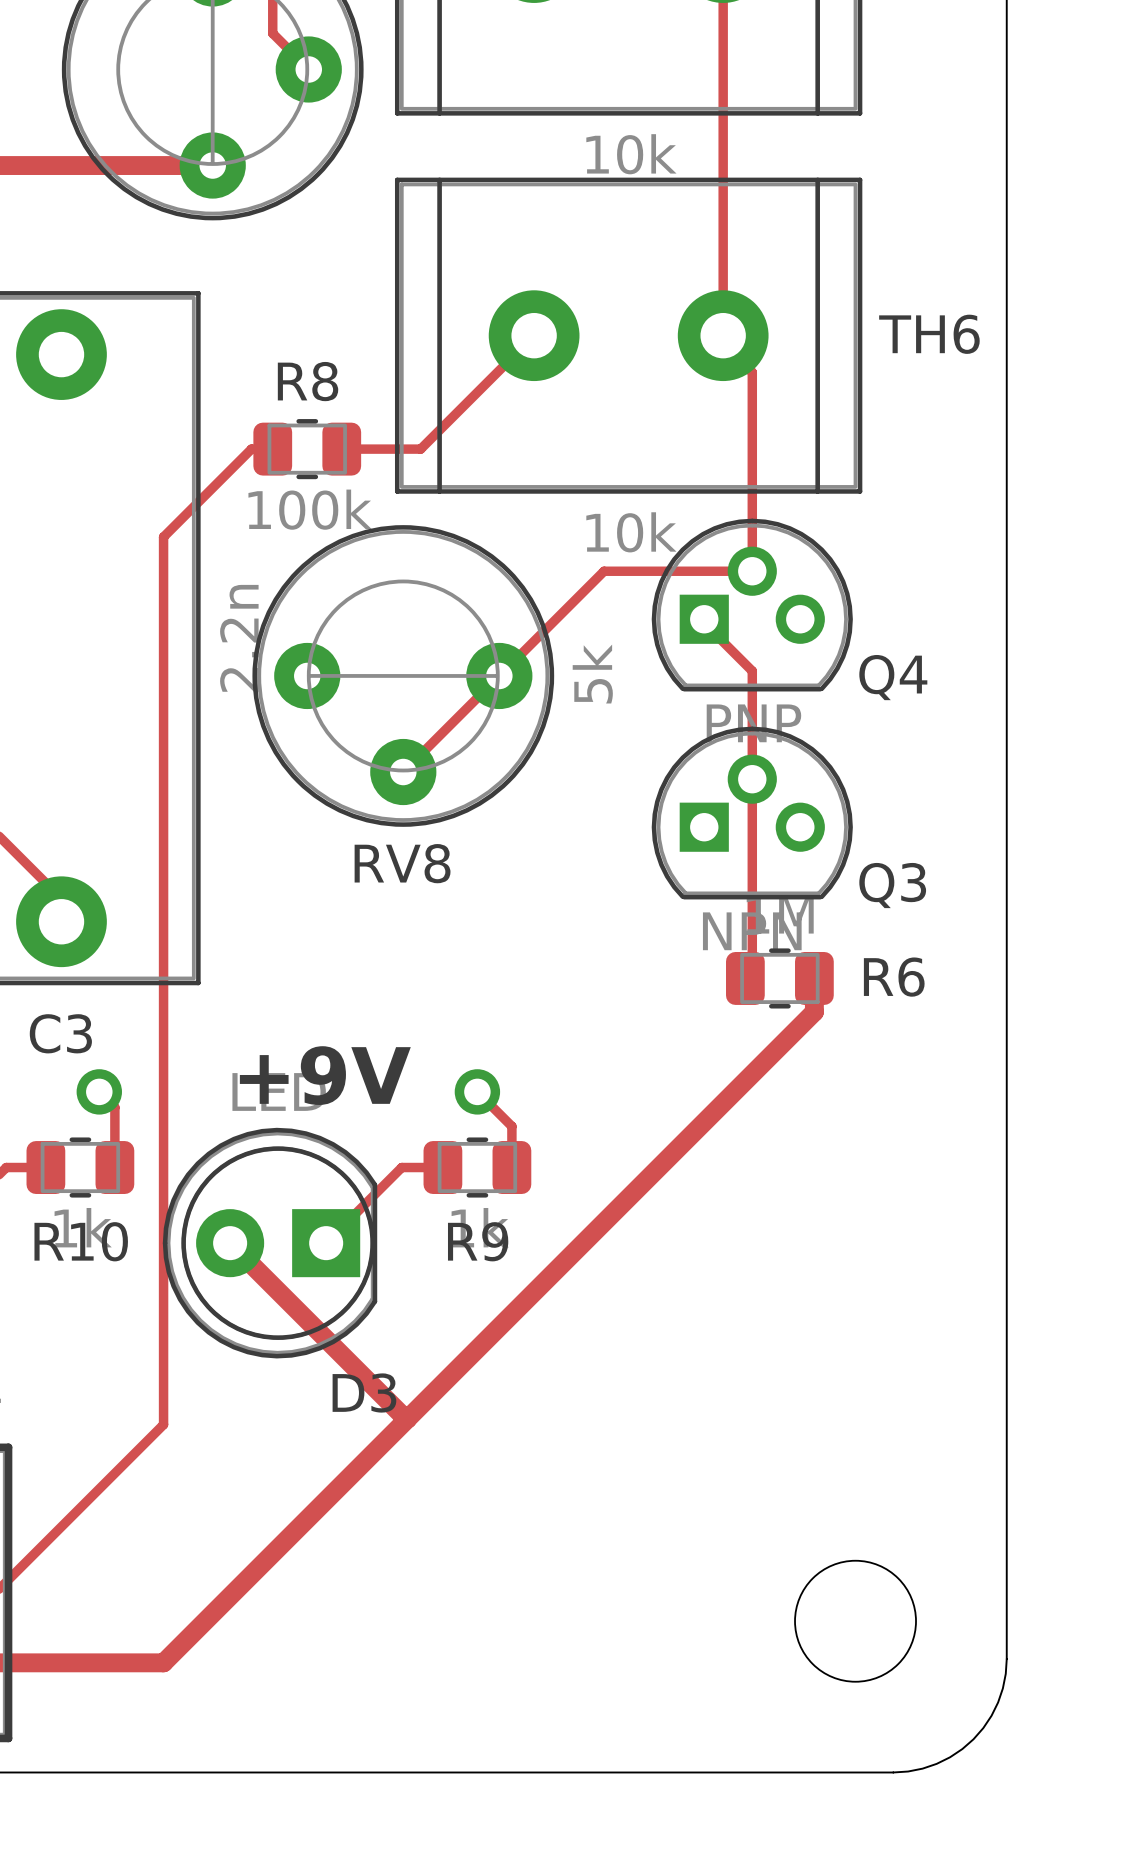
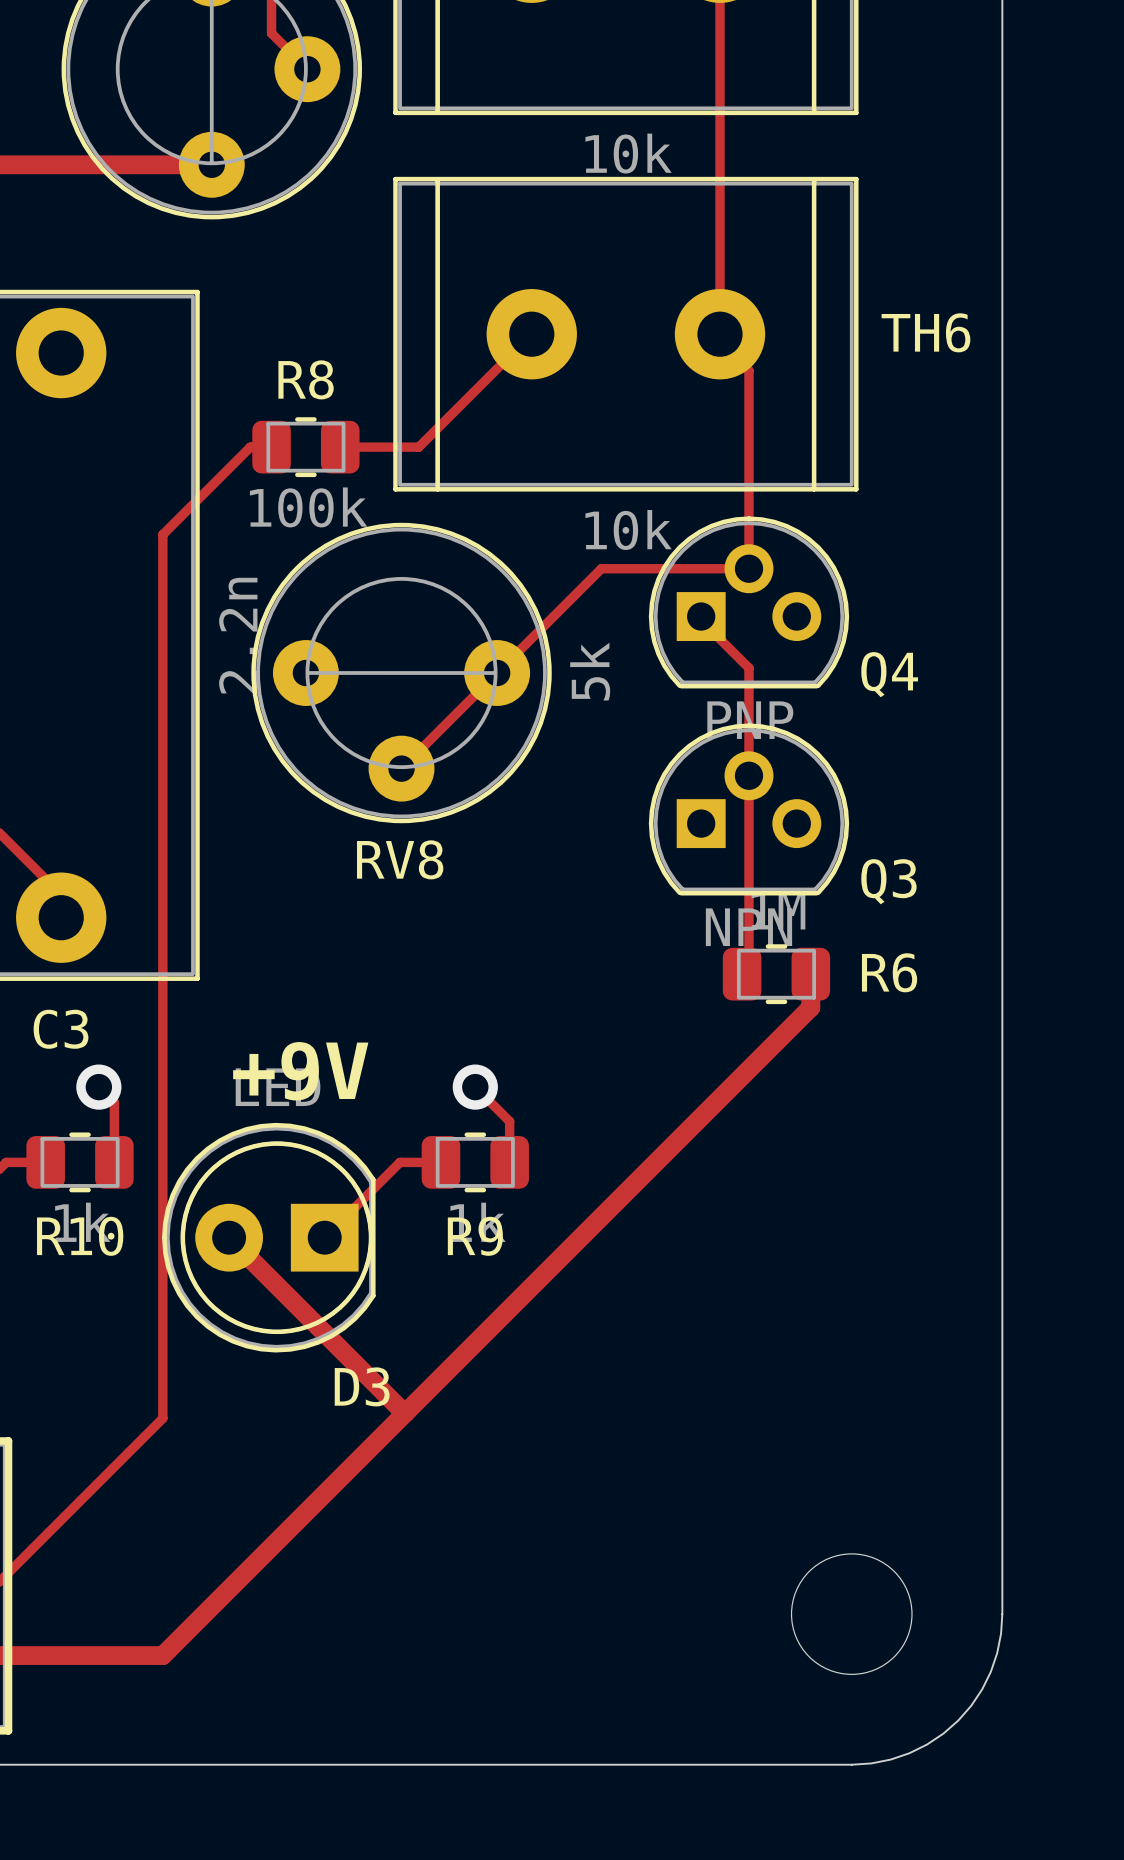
board edge: (1006, 1621) (1006, 1659) (1002, 1688) (991, 1715) (973, 1739) (950, 1757) (922, 1768) (893, 1772) (855, 1772) -> (1002, 1614) (1001, 1633) (990, 1671) (971, 1705) (958, 1720) (943, 1733) (909, 1753) (890, 1759) (851, 1764)

